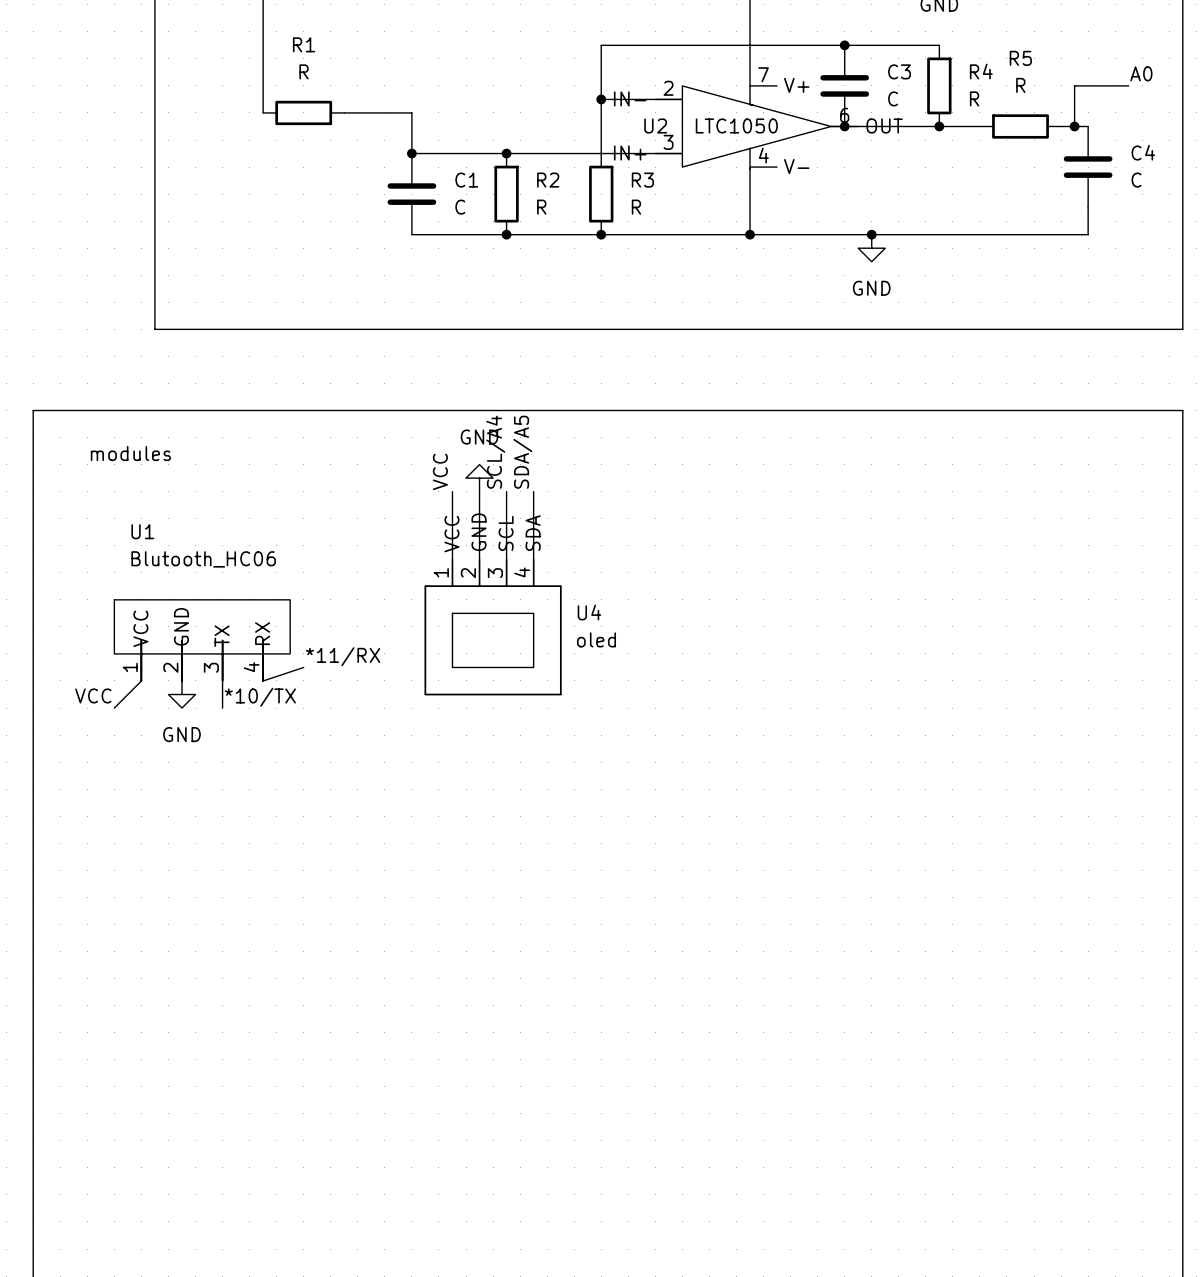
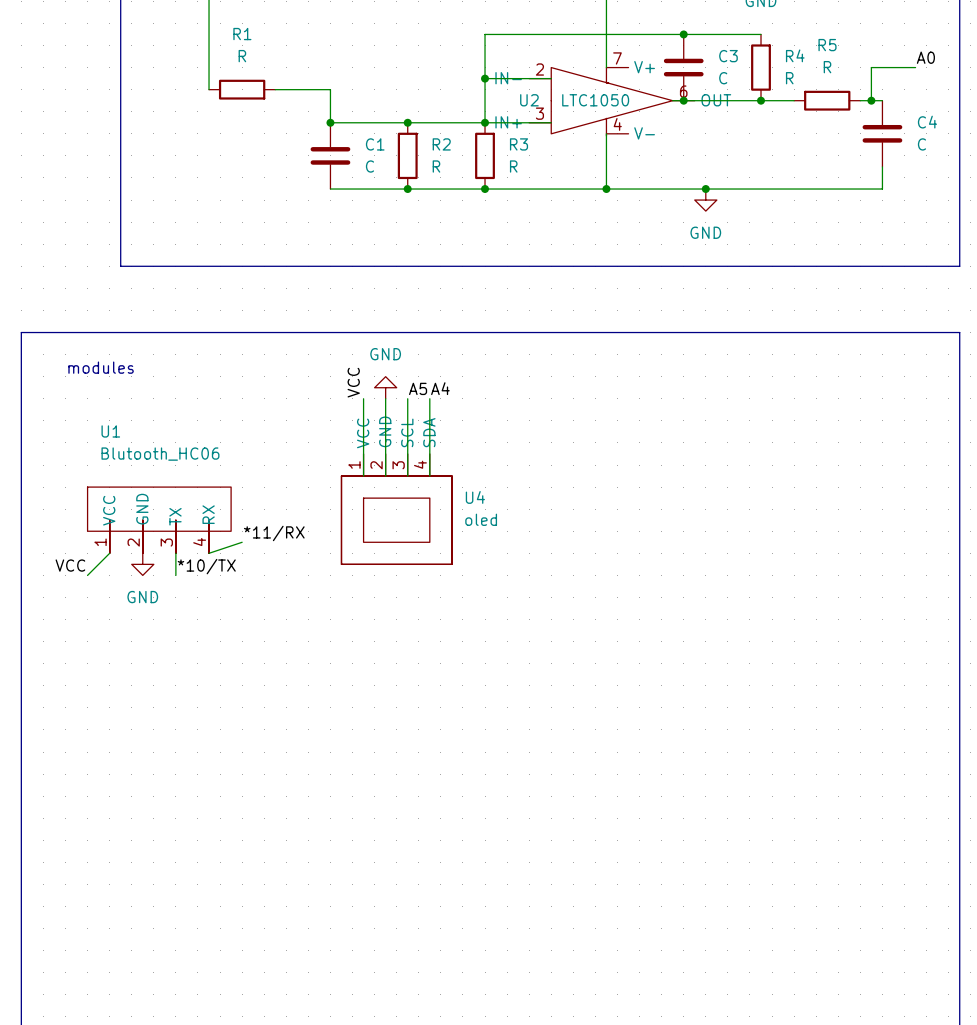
junction: none -> (485, 122)
label: SCL/A4 (495, 452) -> A5 (418, 388)
label: SDA/A5 (522, 452) -> A4 (440, 388)

